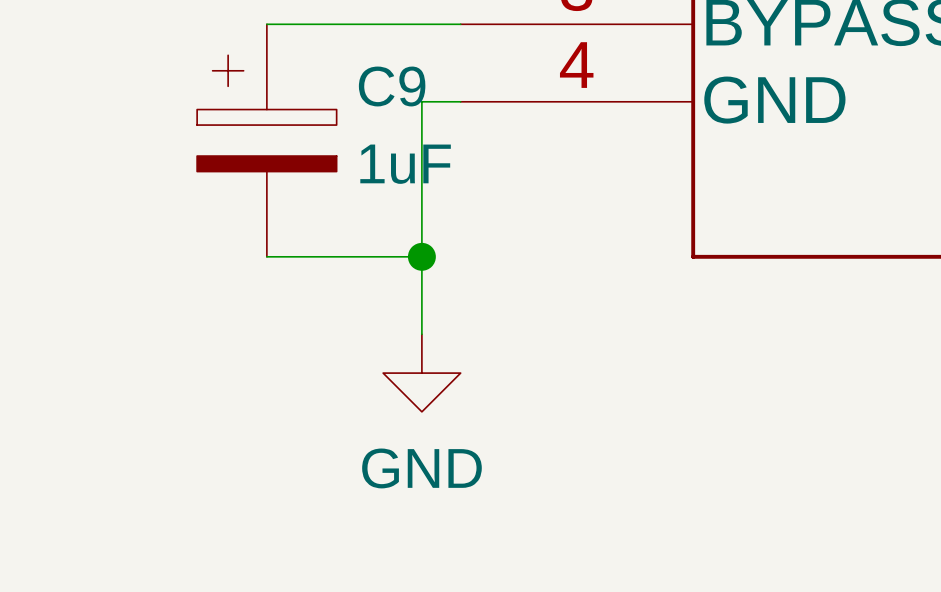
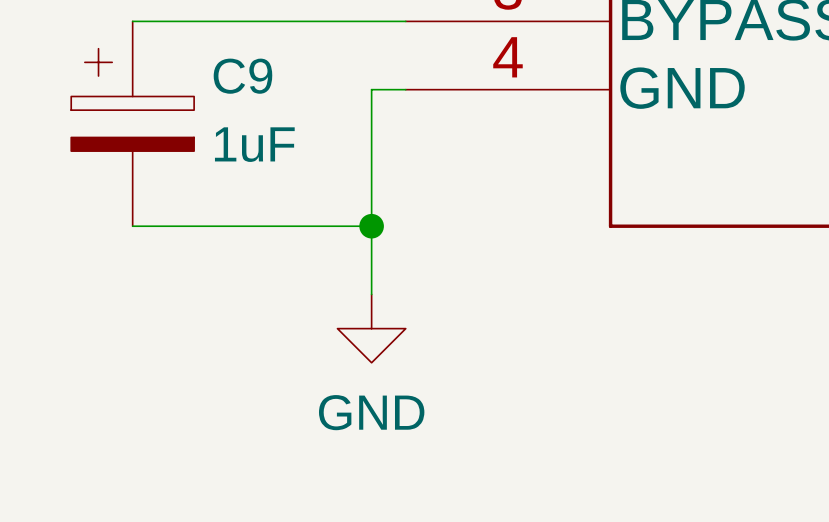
wire: none -> (132, 21) (235, 21)
C9 position: (266, 140) -> (132, 123)
wire: none -> (132, 226) (235, 226)

